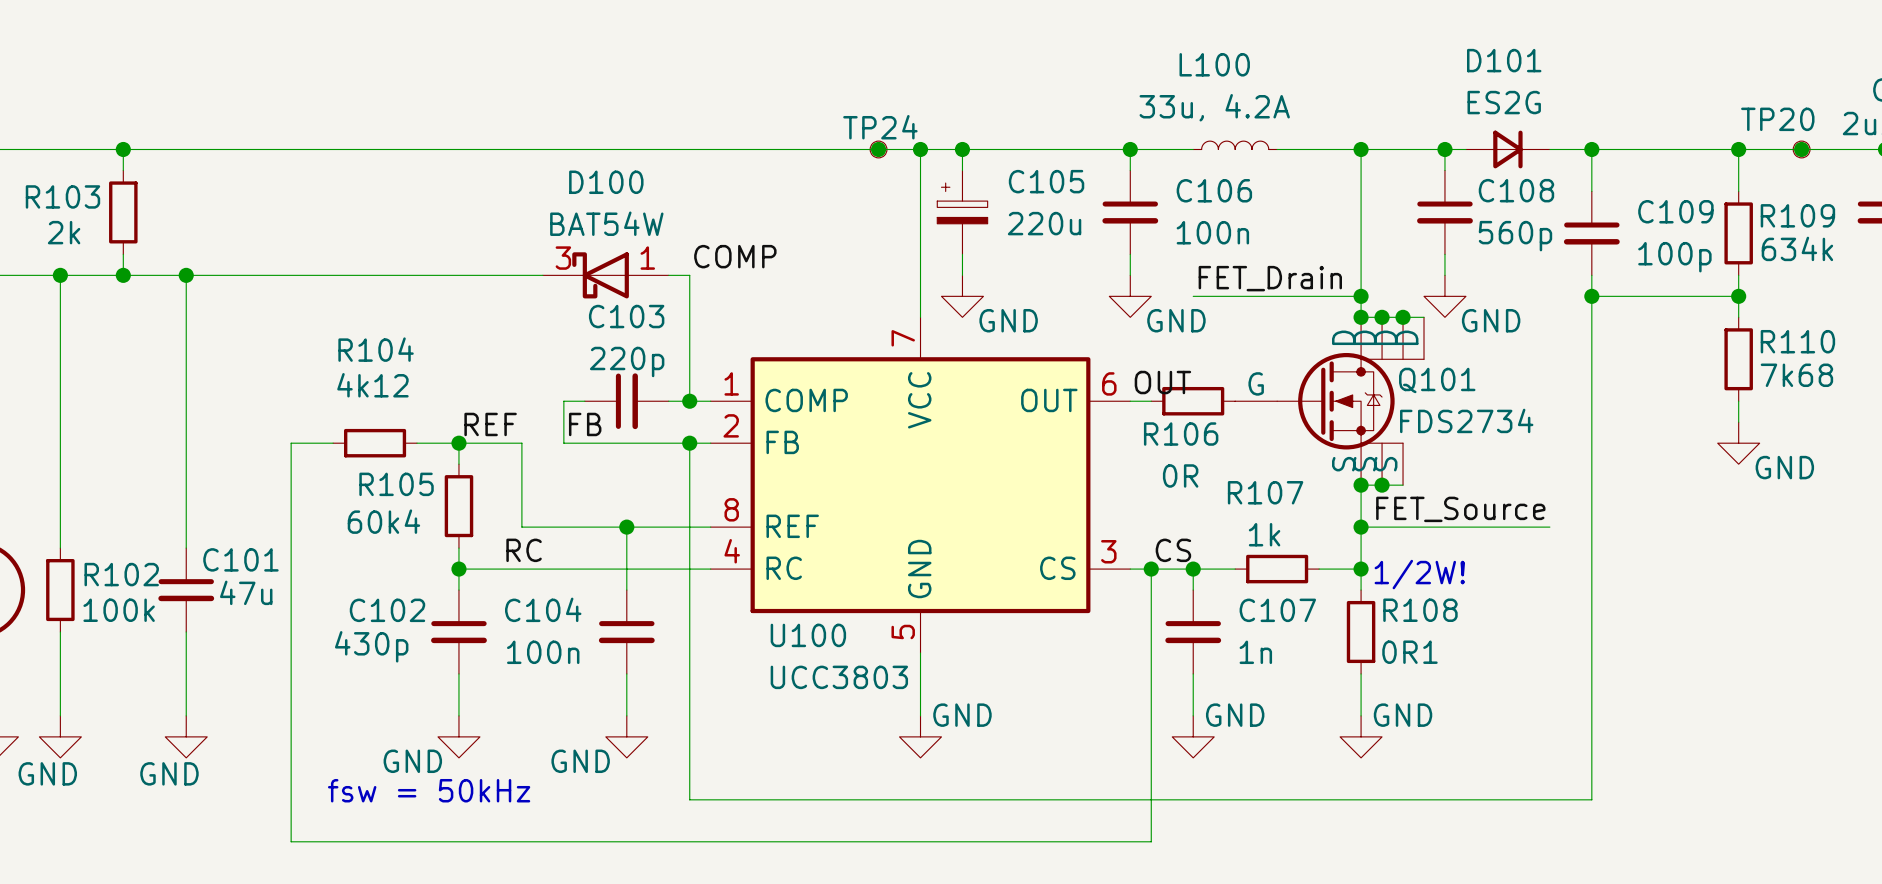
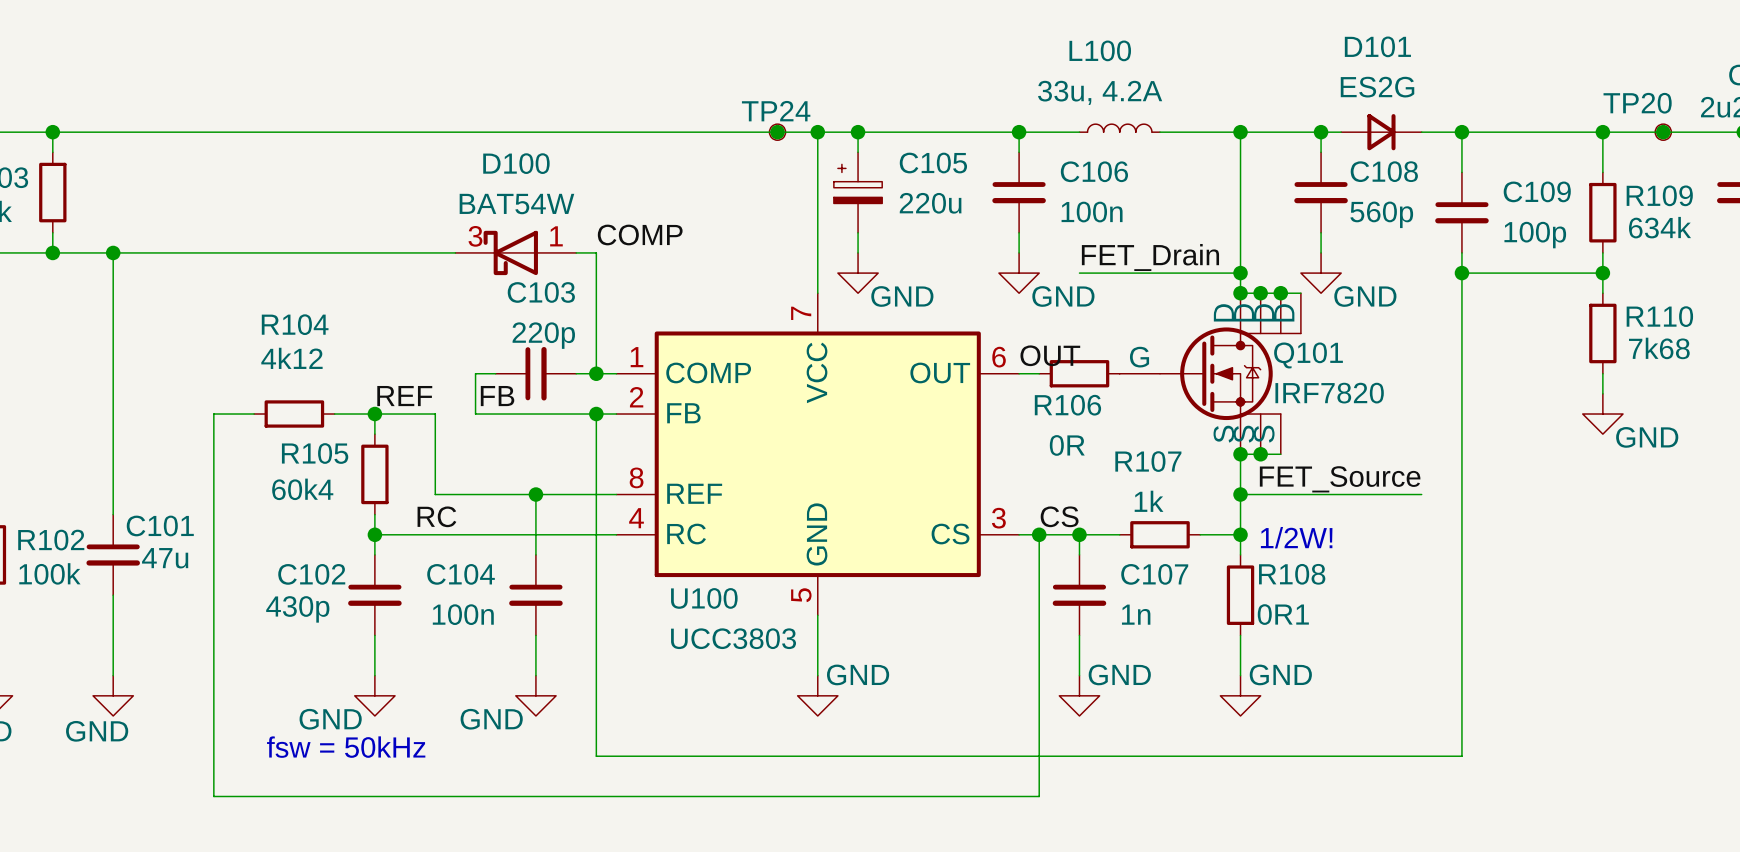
Q101 value: FDS2734 (1466, 420) -> IRF7820 (1329, 393)

